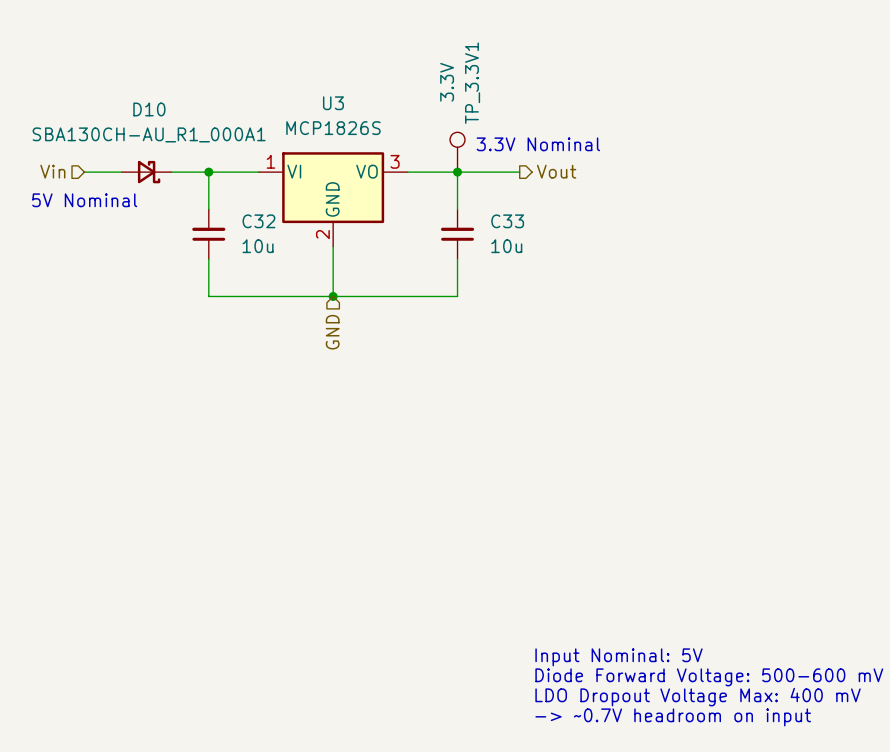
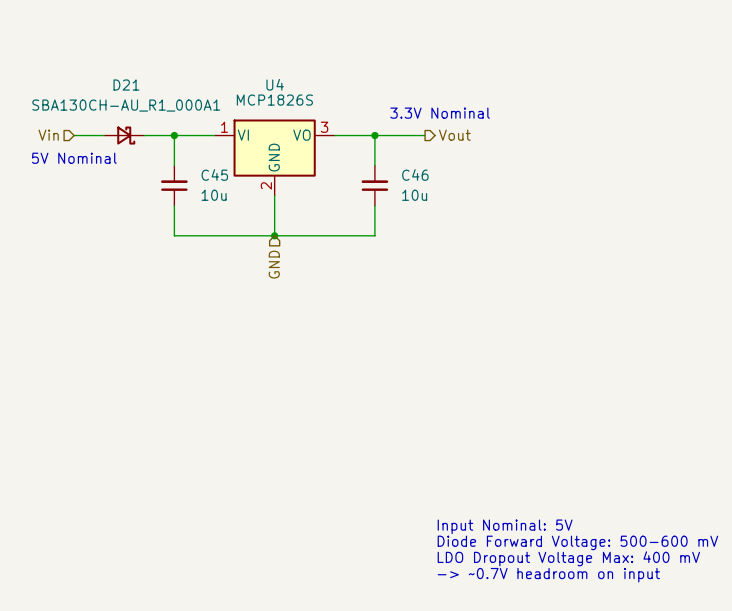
U3 name: U3 (333, 103) -> U4 (275, 84)
D10 name: D10 (149, 109) -> D21 (126, 85)
TP_3.3V1: 3.3V (457, 152) -> none
C32 name: C32 (258, 221) -> C45 (214, 174)
C33 name: C33 (507, 221) -> C46 (415, 174)

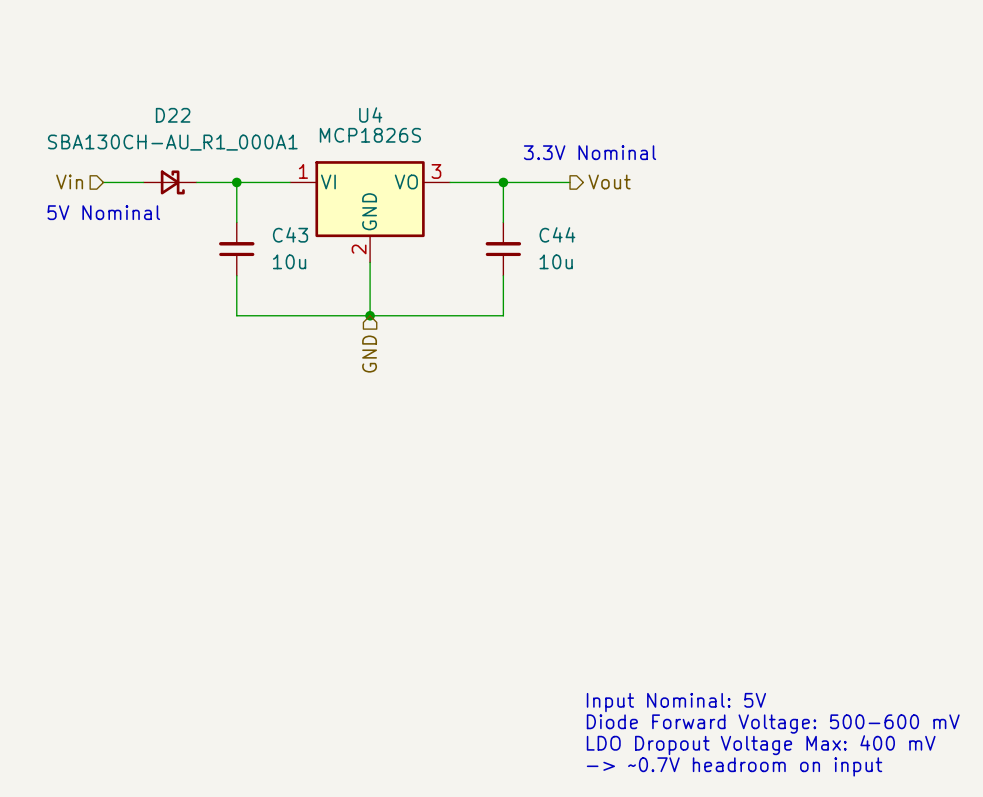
D21 name: D21 (126, 85) -> D22 (173, 115)
C45 name: C45 (214, 174) -> C43 (290, 234)
C46 name: C46 (415, 174) -> C44 (557, 234)

